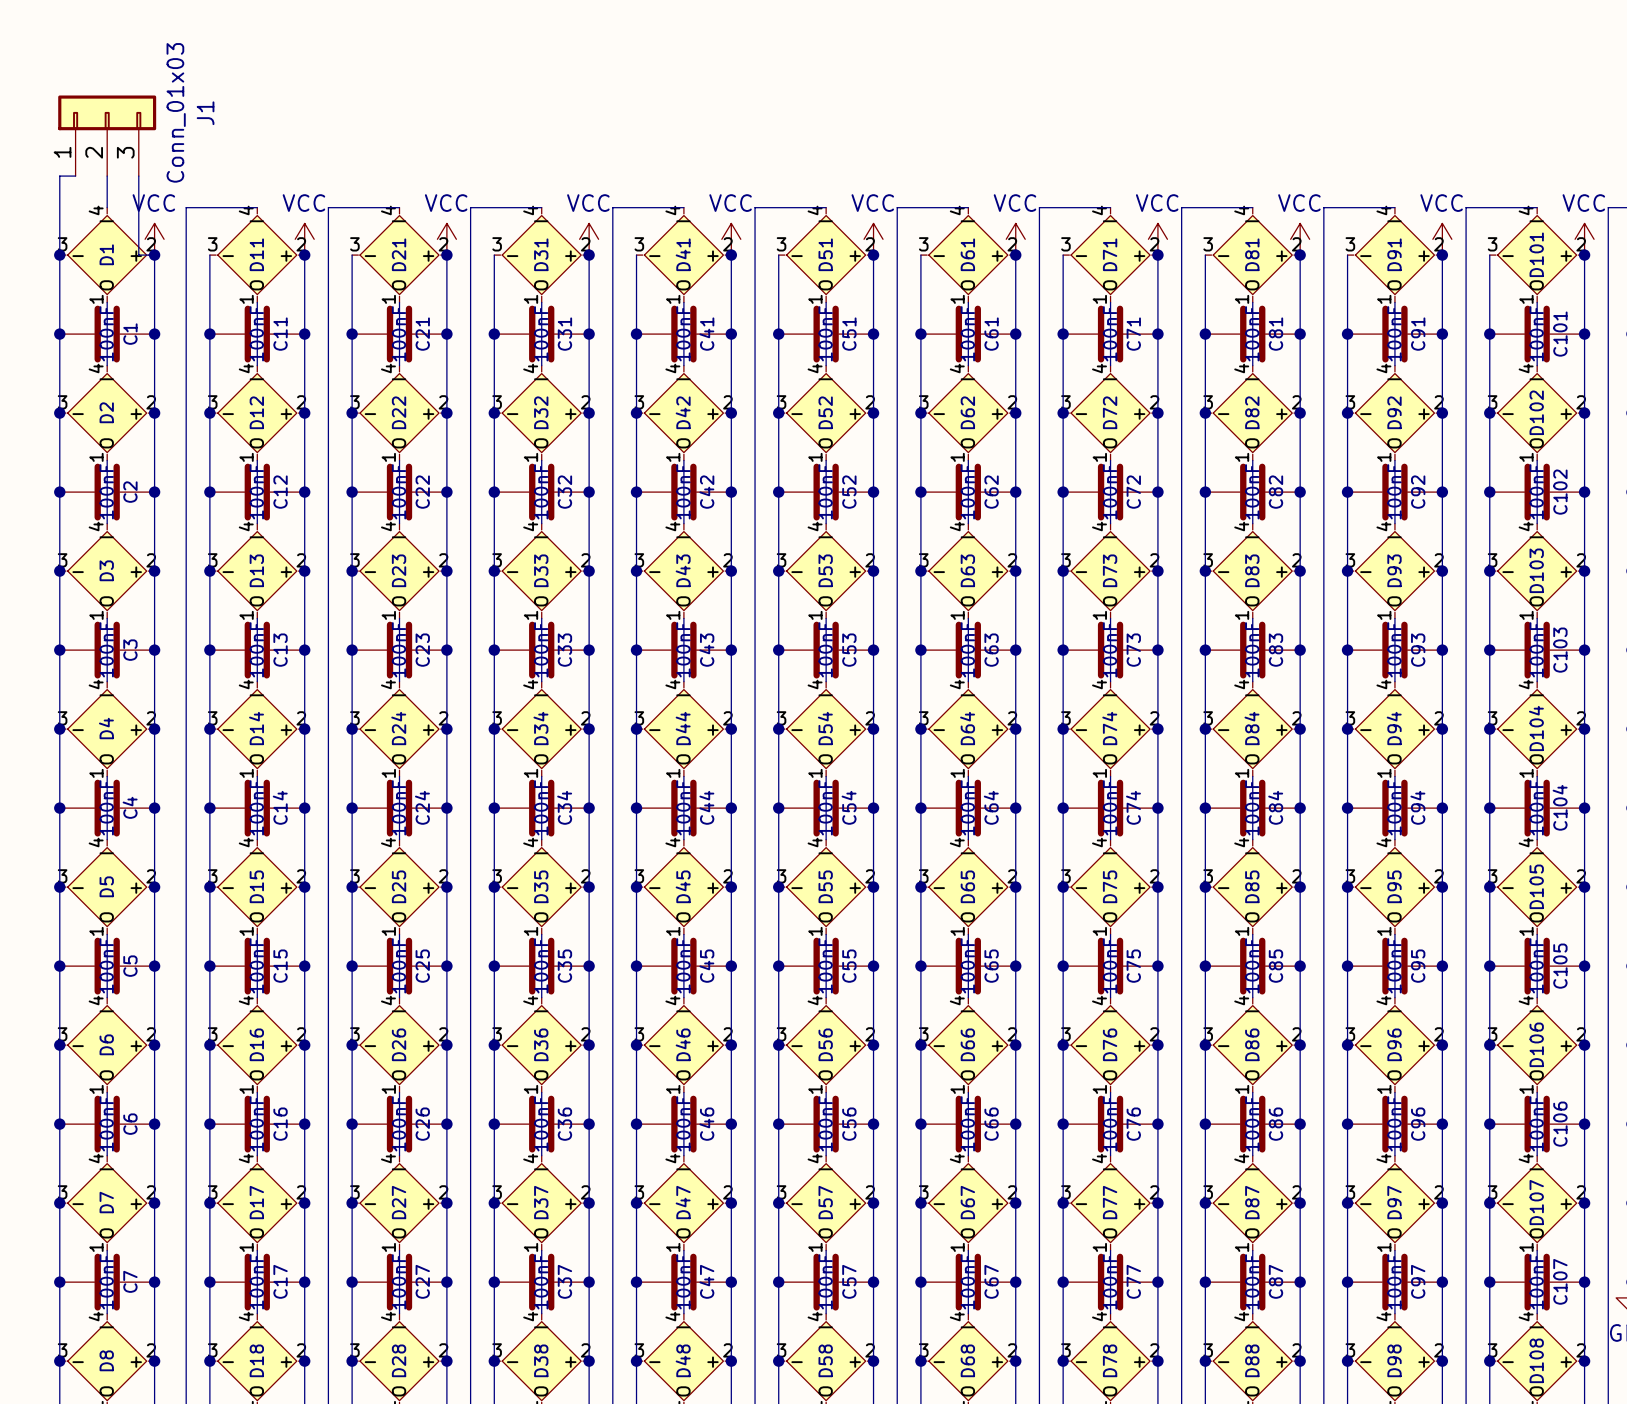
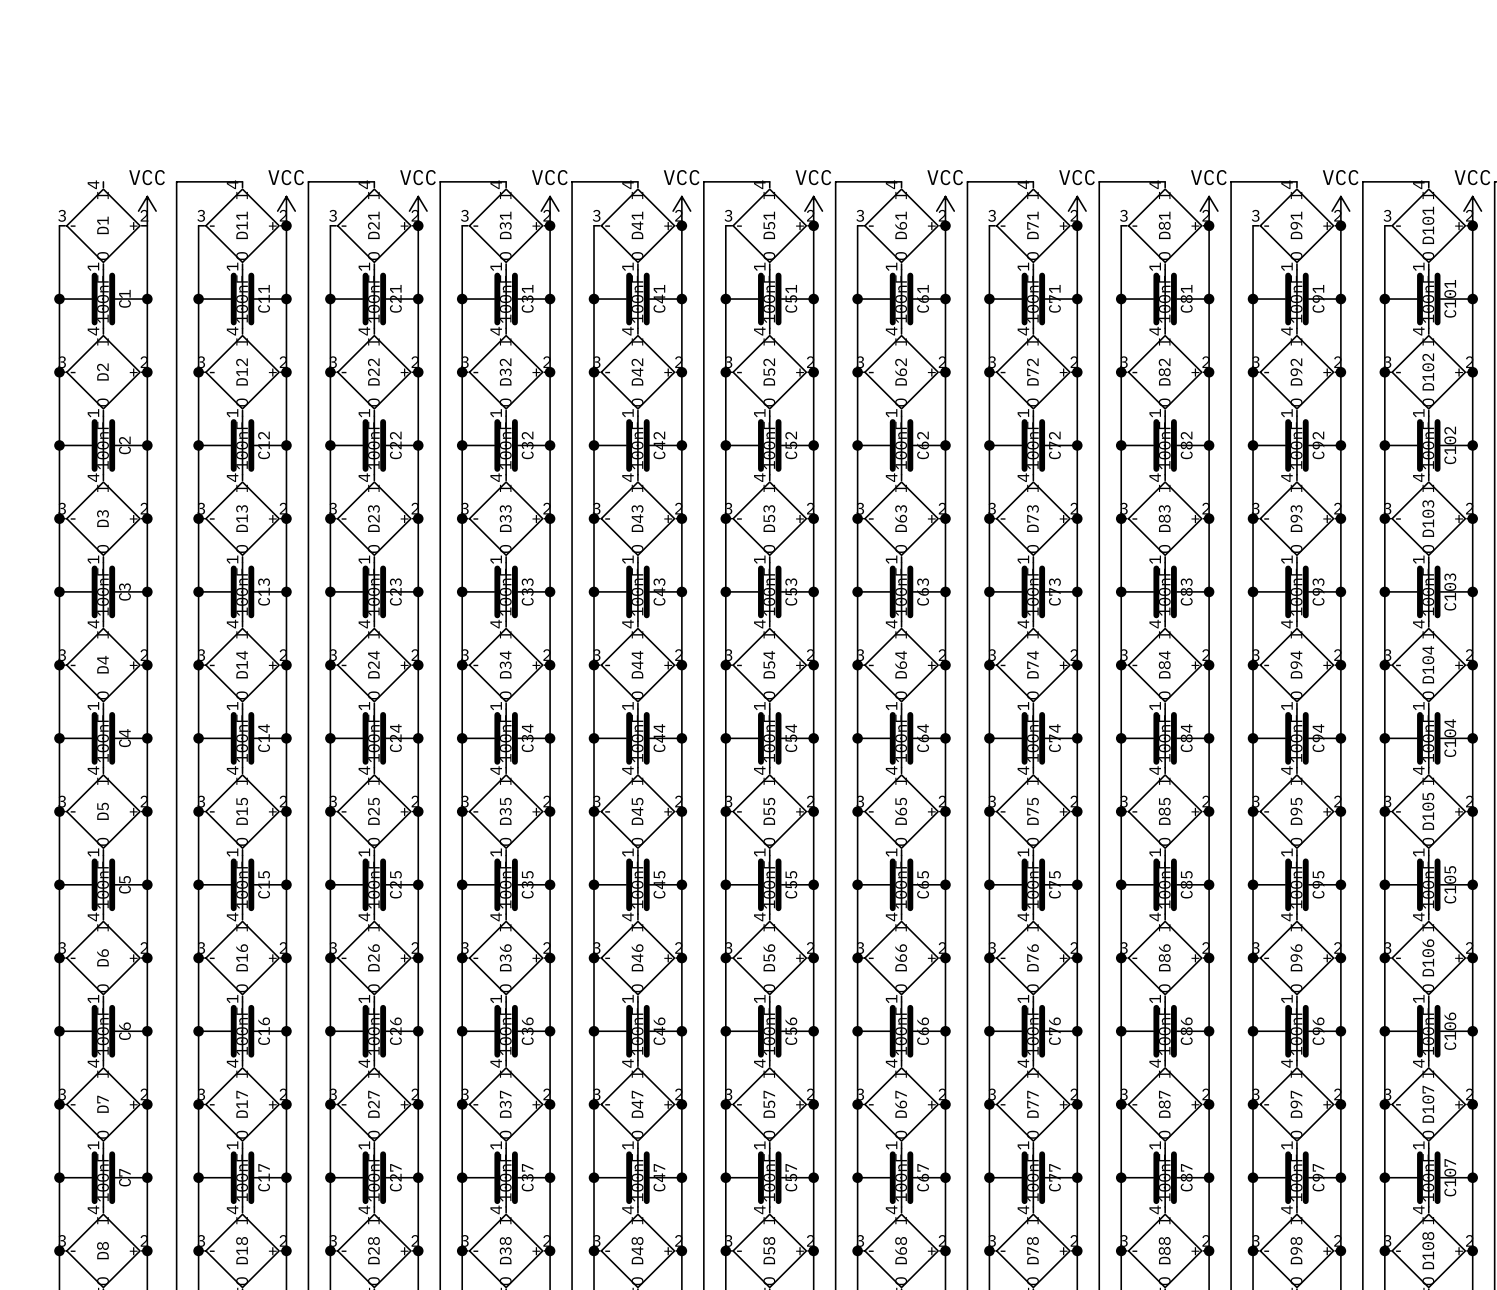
J1: Conn_01x03 (107, 135) -> none
wire: (75, 176) (59, 176) (59, 255) -> none
wire: (107, 176) (107, 207) -> none
wire: (138, 176) (138, 255) (154, 255) -> none
junction: (59, 255) -> none
junction: (154, 255) -> none

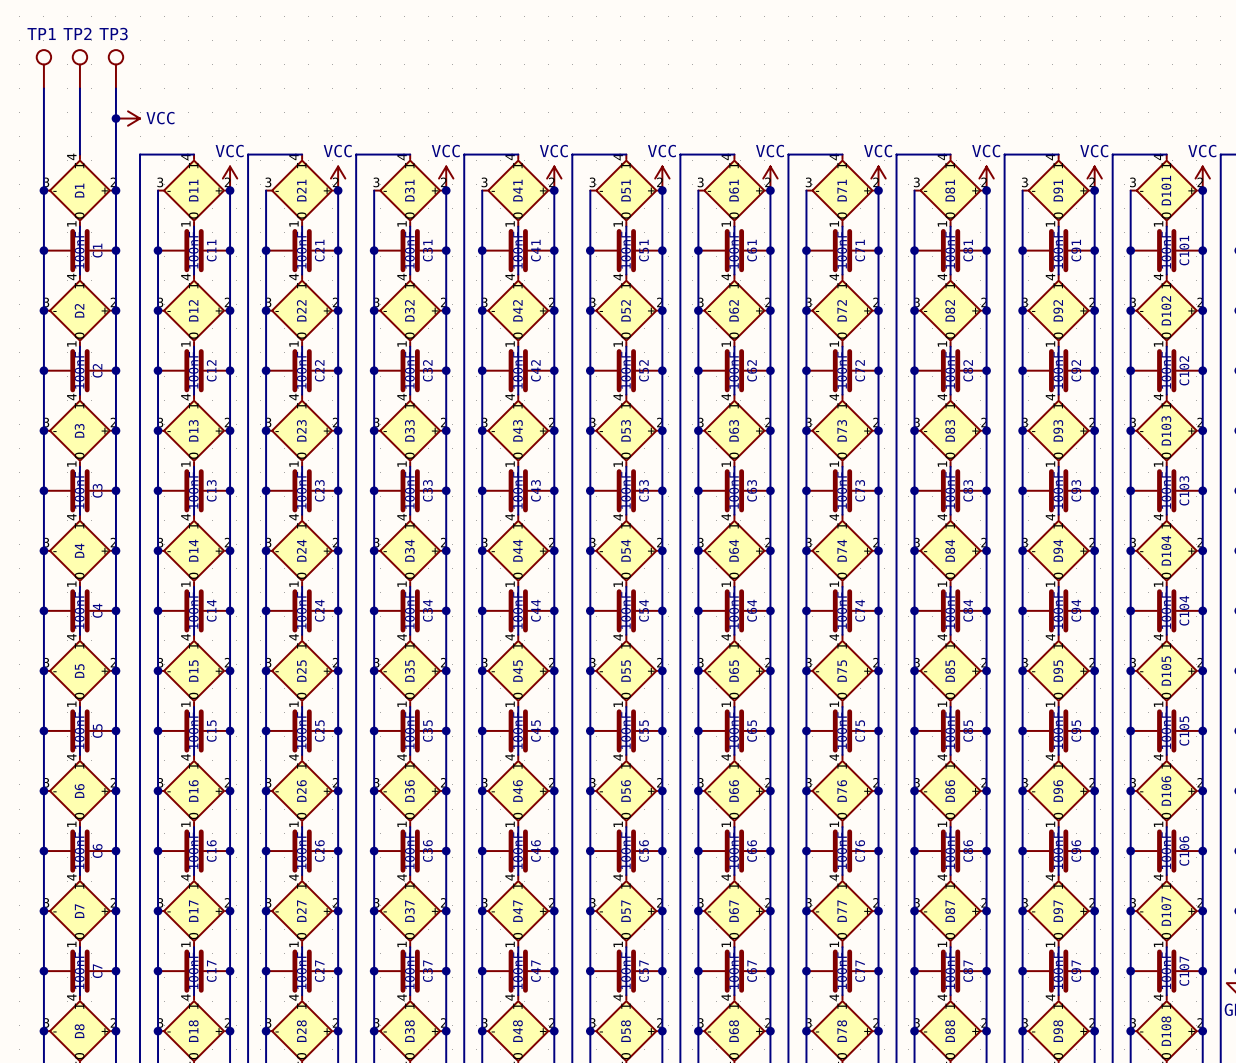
TP1: none -> (43, 69)
TP2: none -> (79, 69)
TP3: none -> (115, 69)
wire: none -> (43, 88) (43, 190)
wire: none -> (79, 88) (79, 154)
wire: none -> (115, 88) (115, 190)
junction: none -> (115, 118)
power symbol rotation: 0° (147, 211) -> 90° clockwise (127, 118)
power symbol position: VCC (147, 211) -> VCC (127, 118)
junction: none -> (43, 190)
junction: none -> (115, 190)

